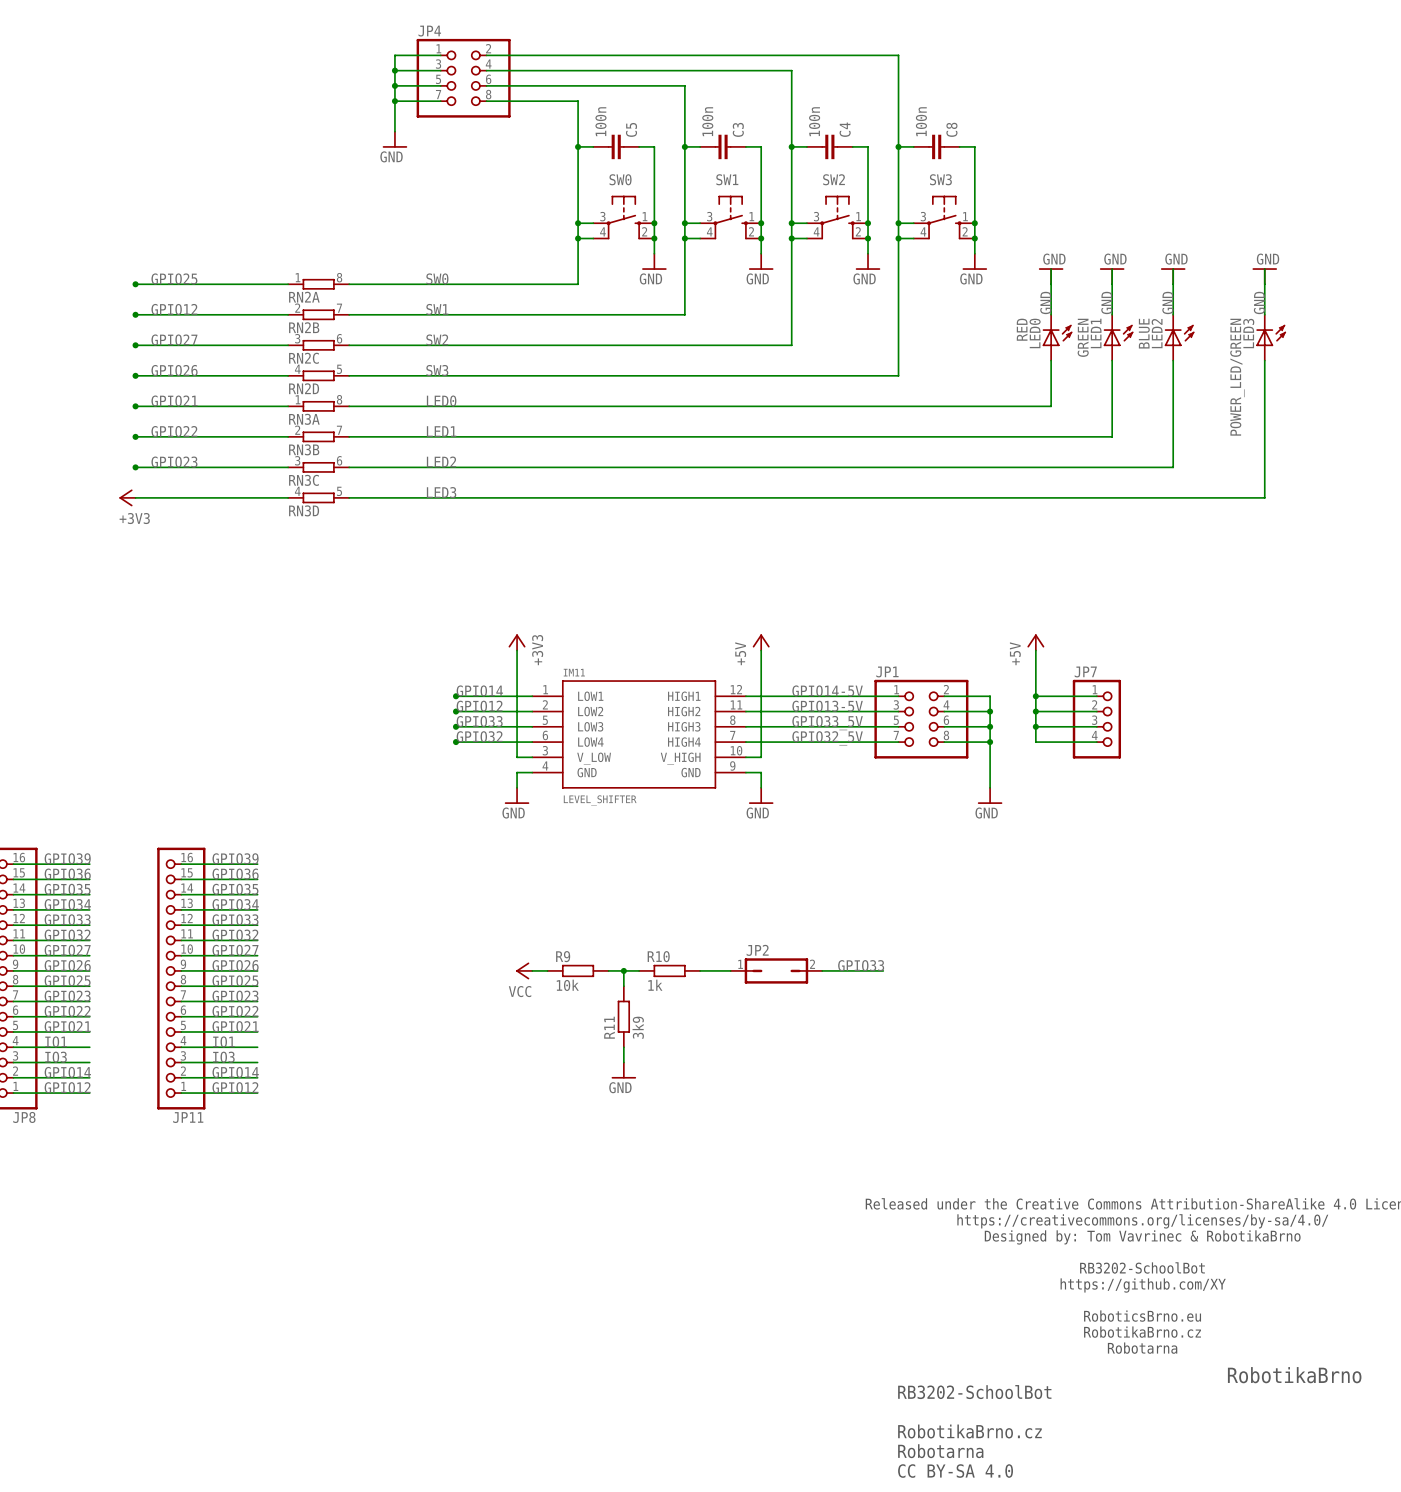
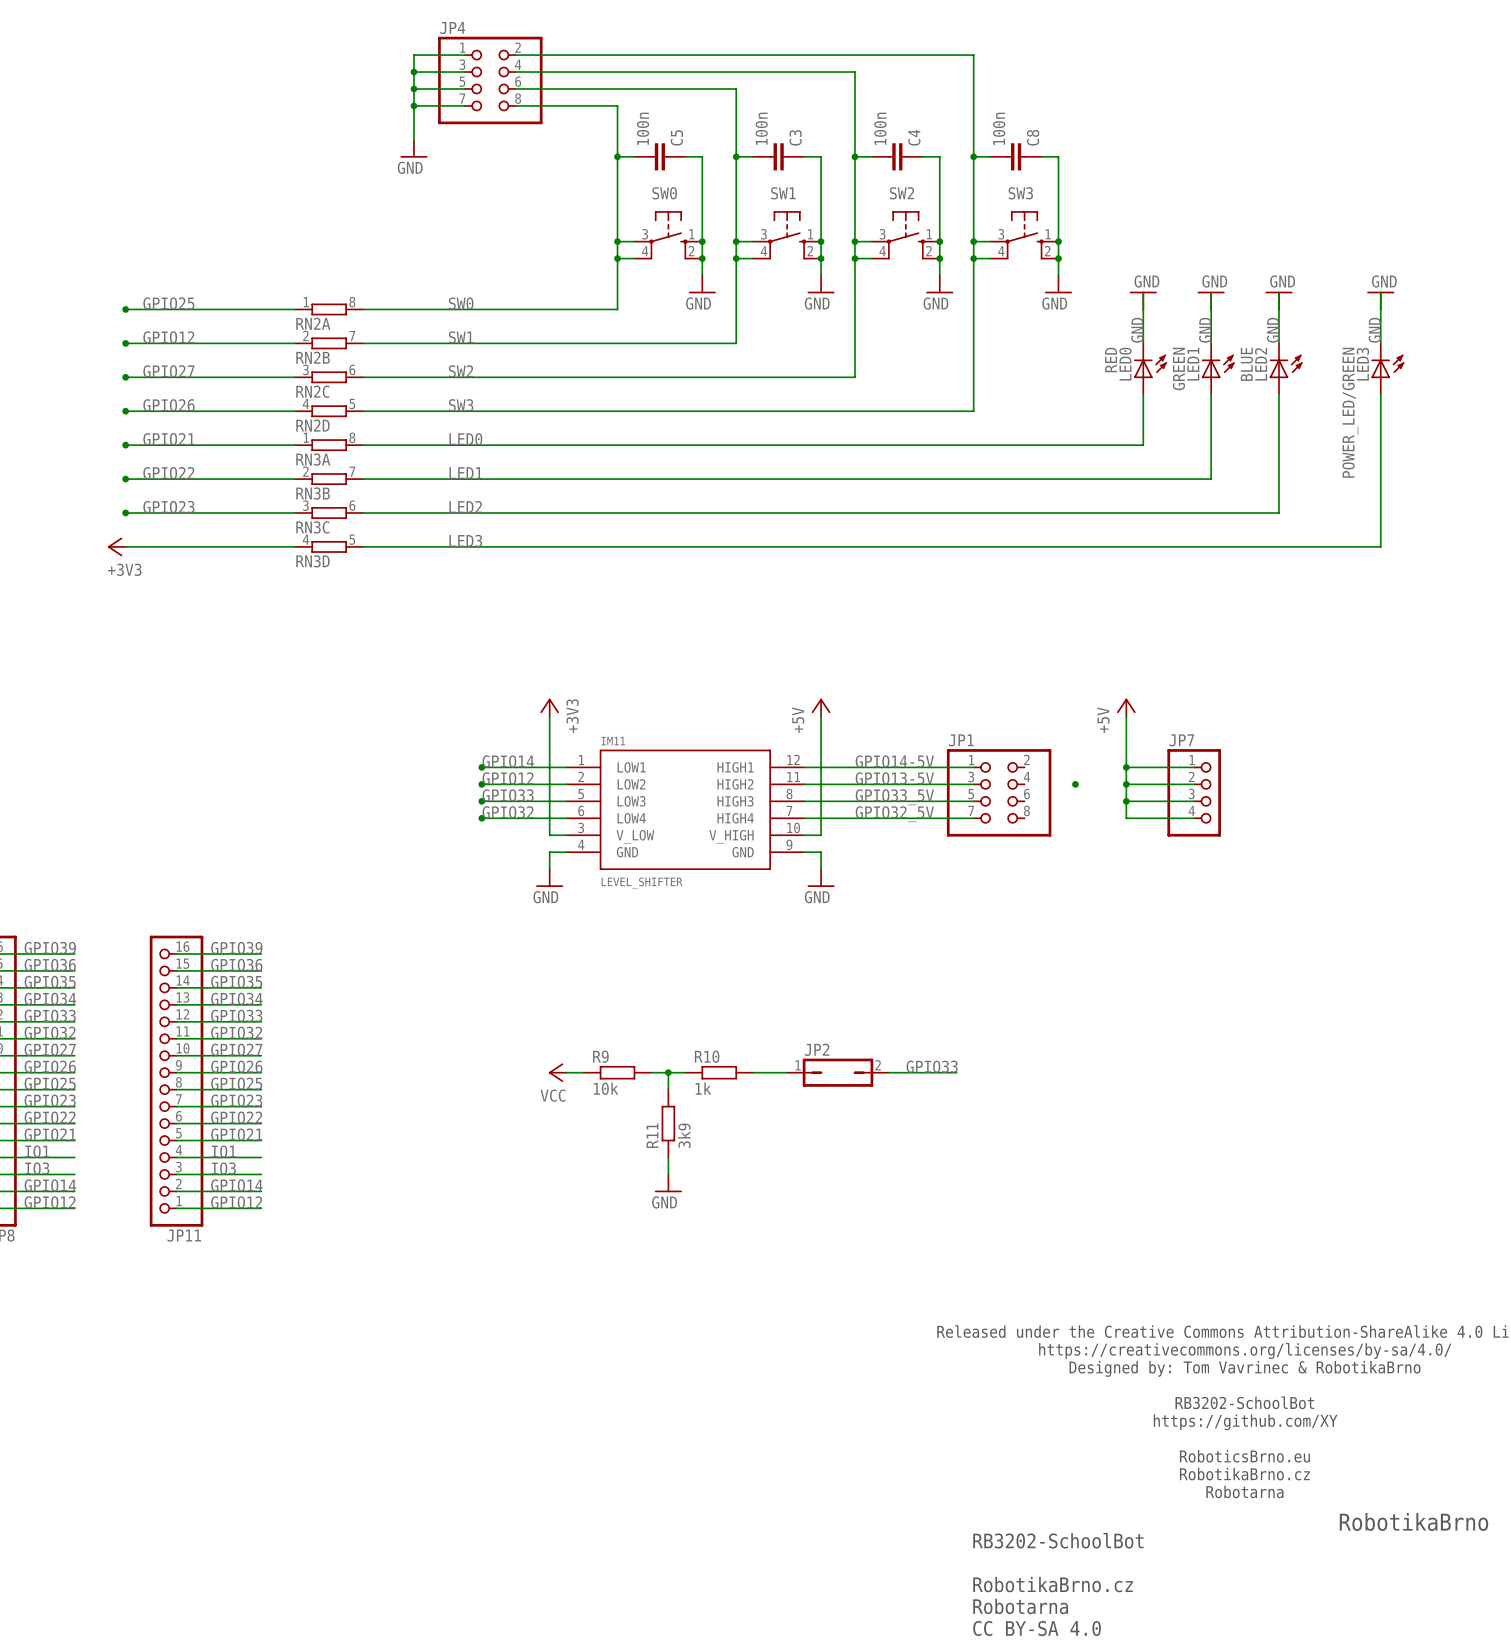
wire: (944, 696) (990, 696) (990, 787) -> none
wire: (944, 711) (990, 711) -> none
wire: (944, 726) (990, 726) -> none
junction: (990, 726) -> none
wire: (944, 742) (990, 742) -> none
junction: (990, 742) -> none
power symbol: GND (990, 795) -> none

